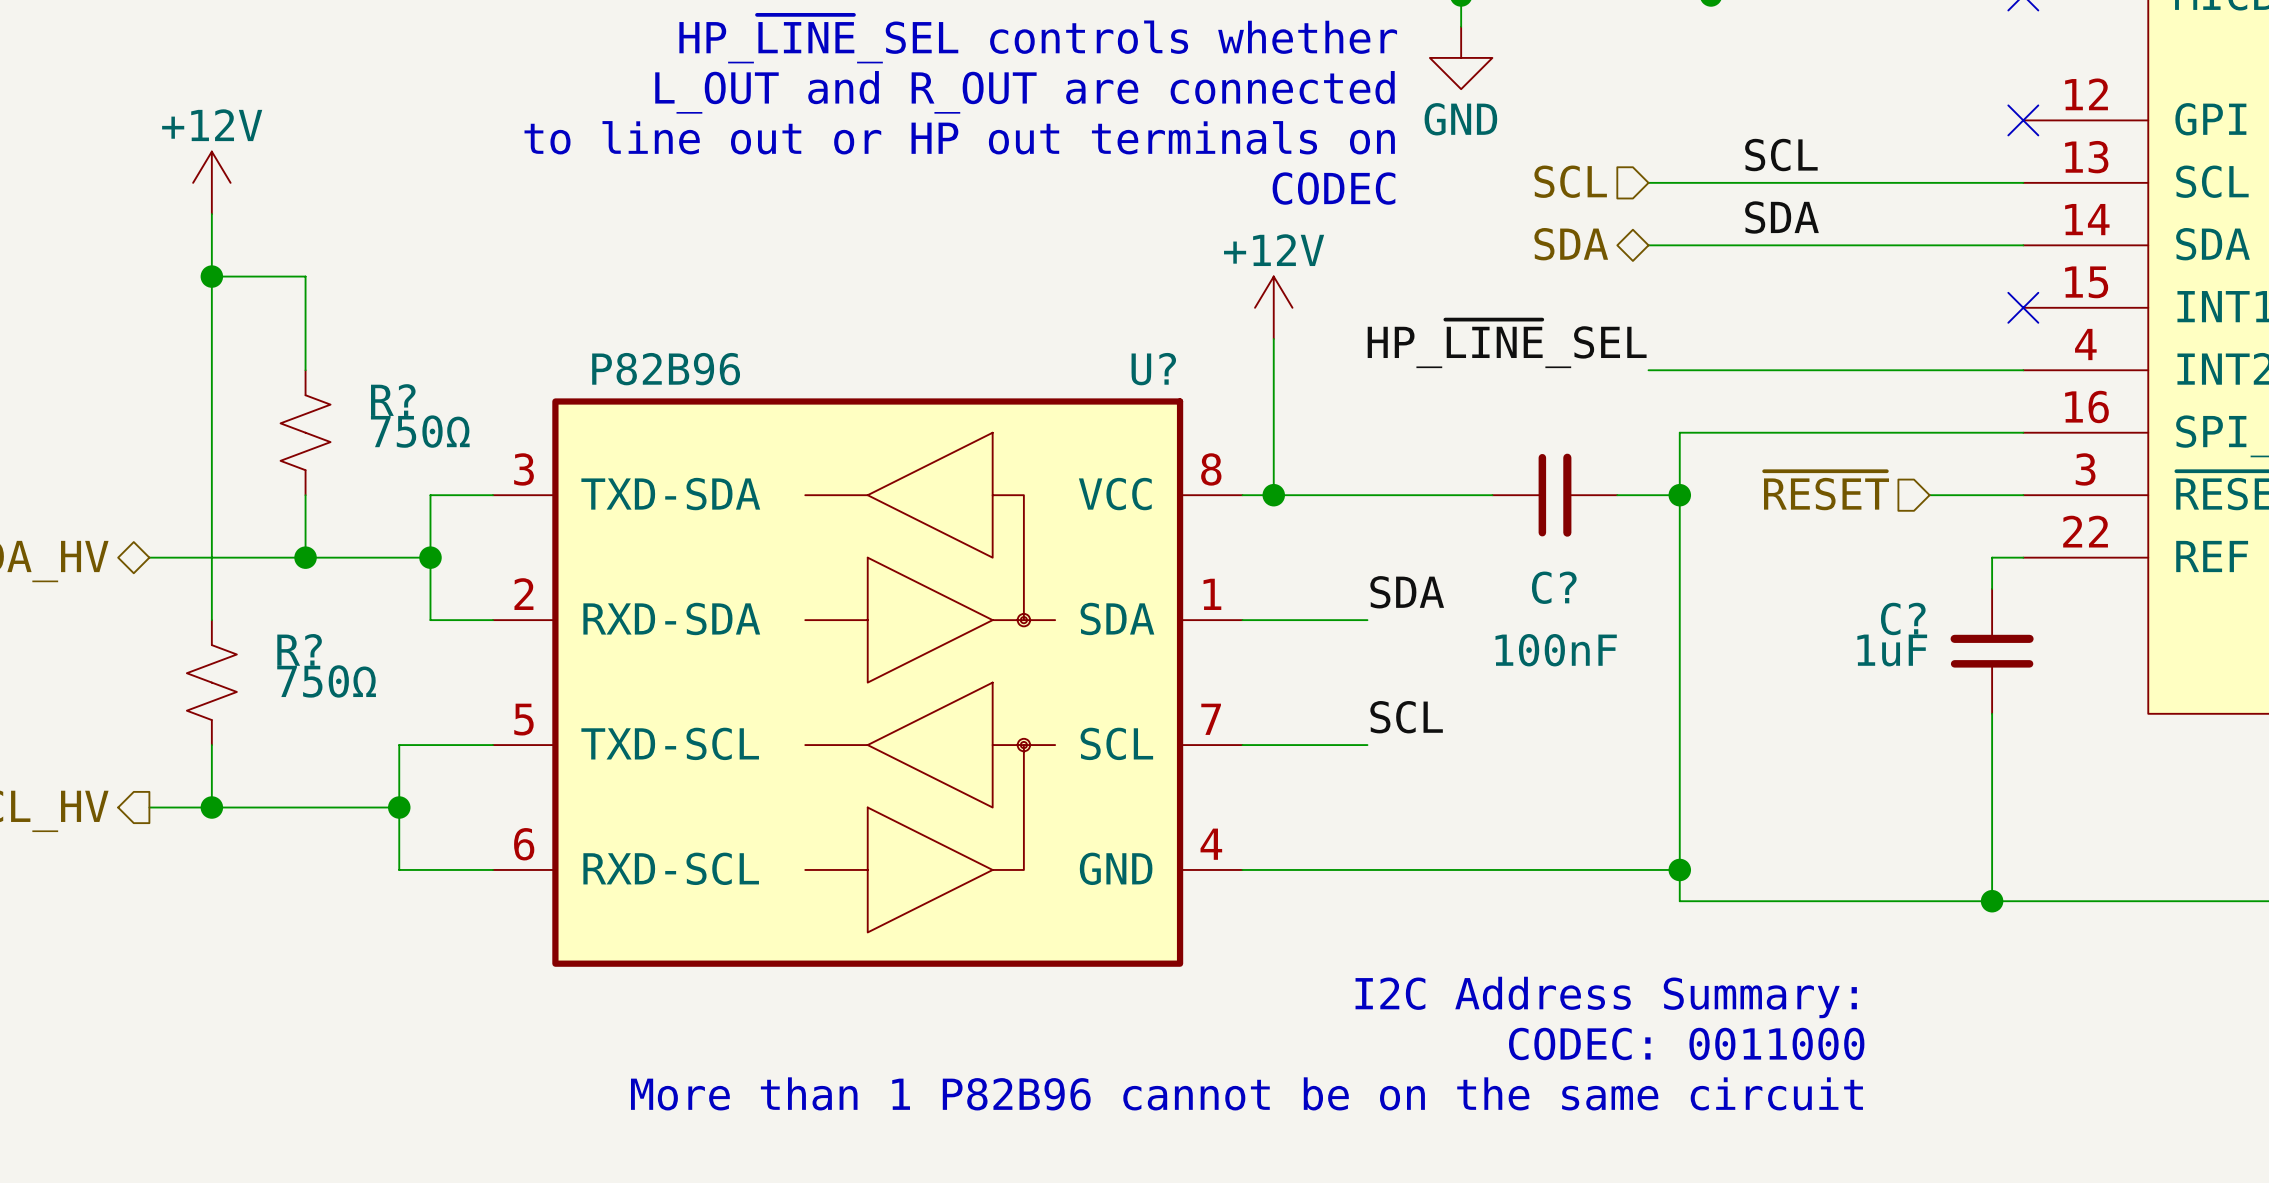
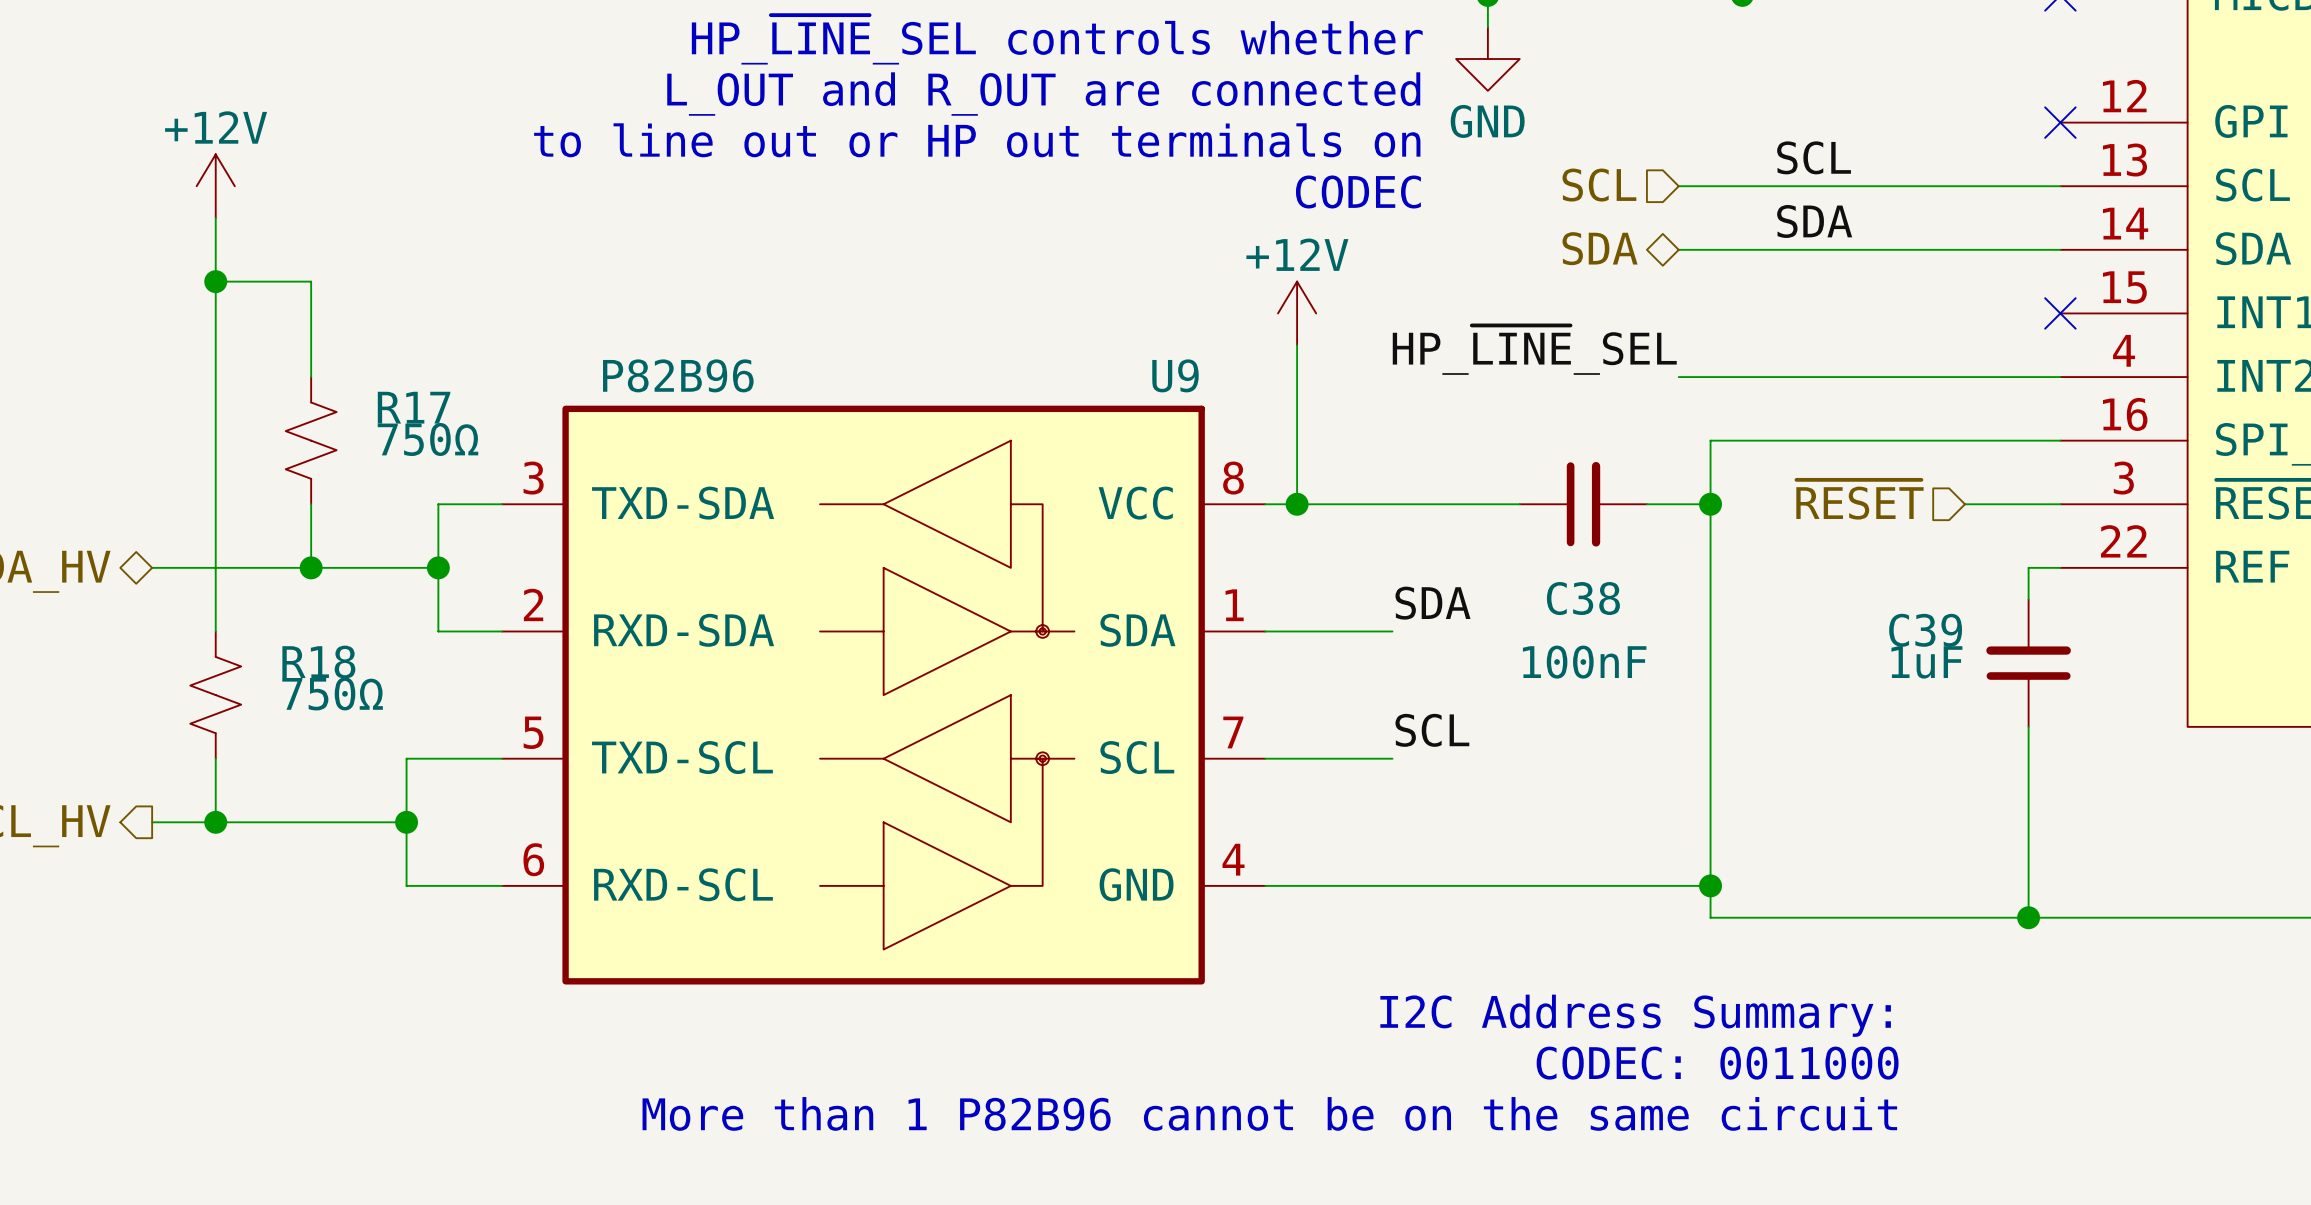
U? name: U? (1153, 369) -> U9 (1175, 375)
R? name: R? (393, 400) -> R17 (414, 407)
C? name: C? (1554, 587) -> C38 (1583, 598)
C? name: C? (1903, 618) -> C39 (1925, 630)
R? name: R? (299, 649) -> R18 (318, 662)

